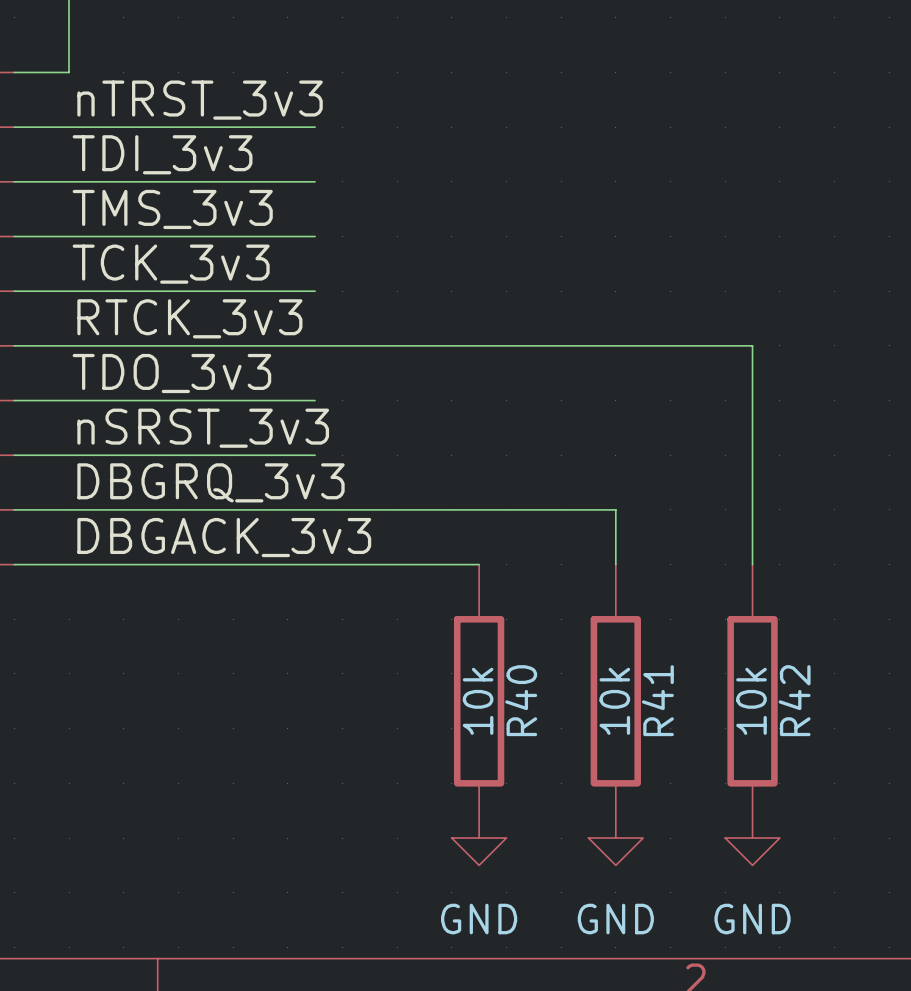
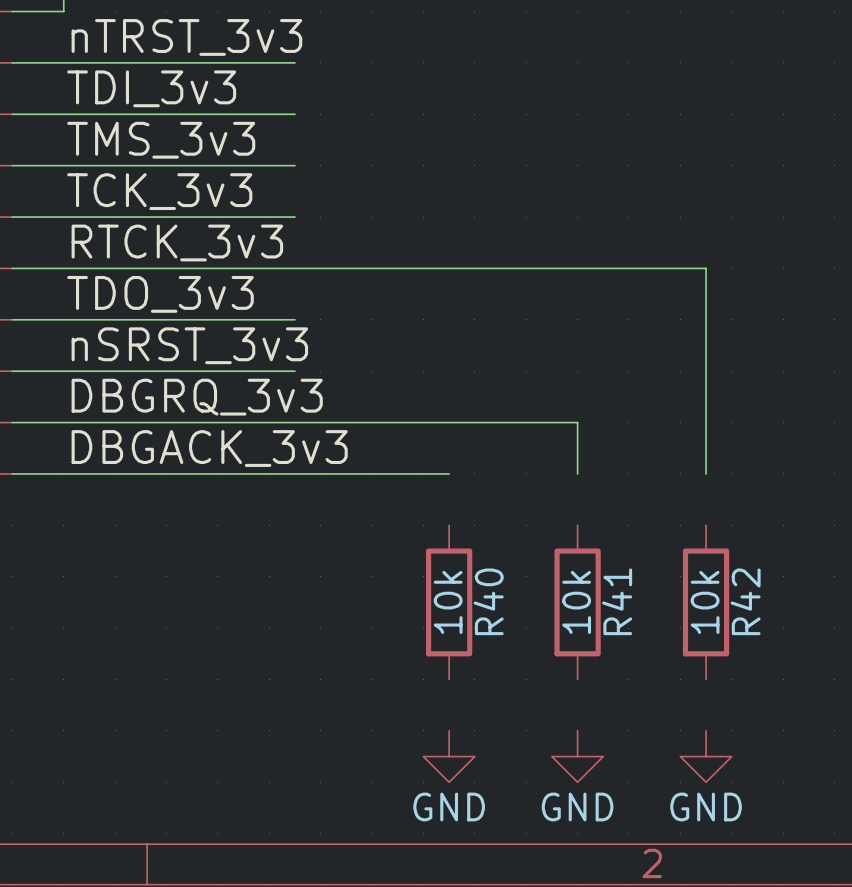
R40 symbol: [453, 564, 505, 839] -> [426, 525, 473, 680]
R41 symbol: [590, 564, 641, 839] -> [554, 525, 601, 680]
R42 symbol: [727, 564, 778, 839] -> [682, 525, 730, 680]
power symbol shape: [451, 838, 507, 866] -> [423, 730, 475, 783]
power symbol shape: [588, 838, 644, 866] -> [551, 730, 604, 783]
power symbol shape: [725, 838, 780, 866] -> [680, 730, 732, 783]

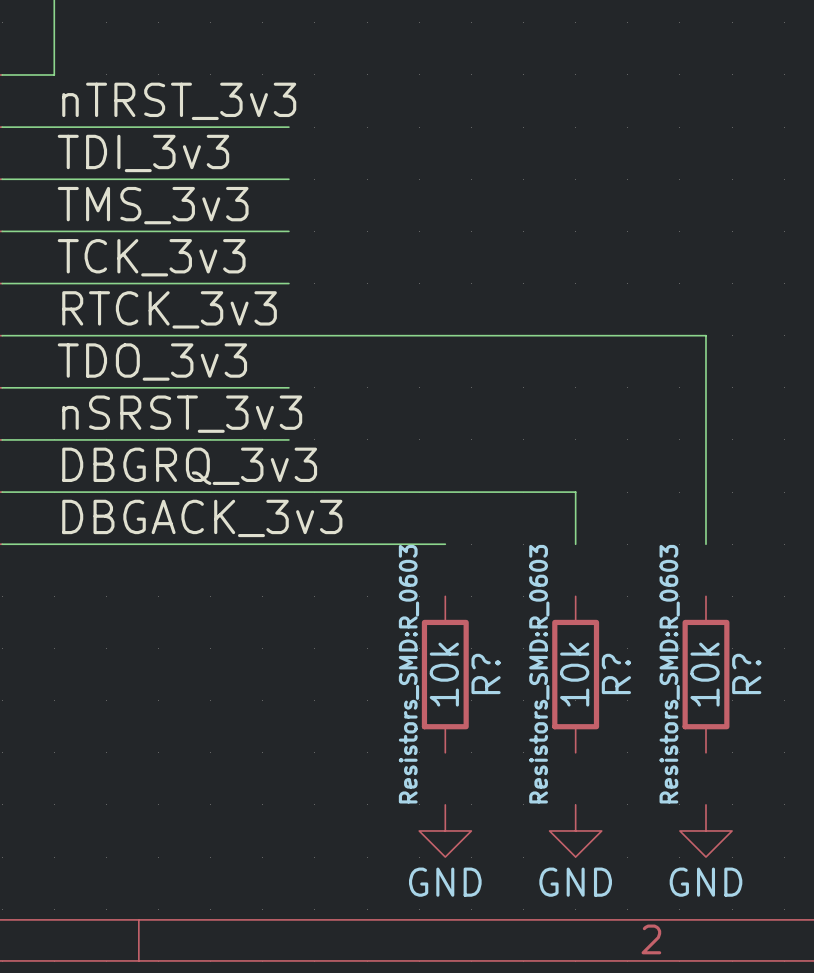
R40 name: R40 (488, 601) -> R? (486, 673)
R41 name: R41 (617, 601) -> R? (616, 673)
R42 name: R42 (745, 601) -> R? (746, 673)
R40 text: none -> Resistors_SMD:R_0603 (408, 674)
R41 text: none -> Resistors_SMD:R_0603 (539, 674)
R42 text: none -> Resistors_SMD:R_0603 (669, 674)

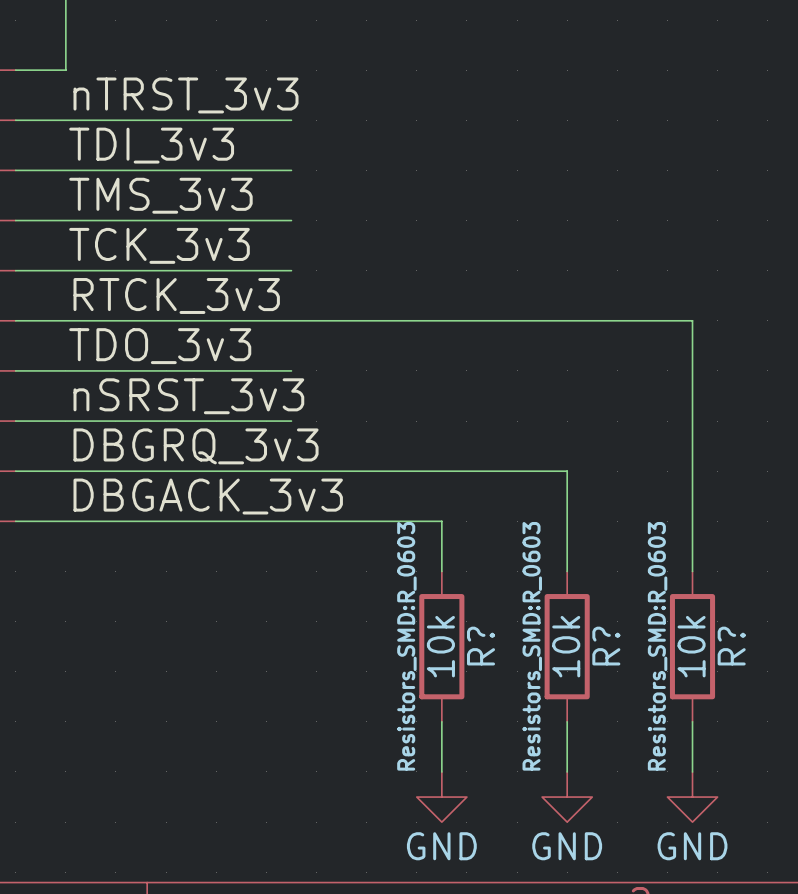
wire: none -> (441, 521) (441, 571)
wire: none -> (567, 521) (567, 571)
wire: none -> (692, 521) (692, 571)
wire: none -> (441, 721) (441, 771)
wire: none -> (567, 721) (567, 771)
wire: none -> (692, 721) (692, 771)

